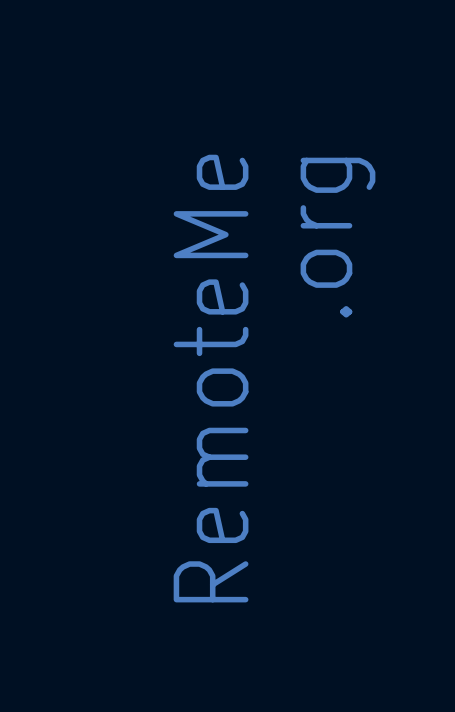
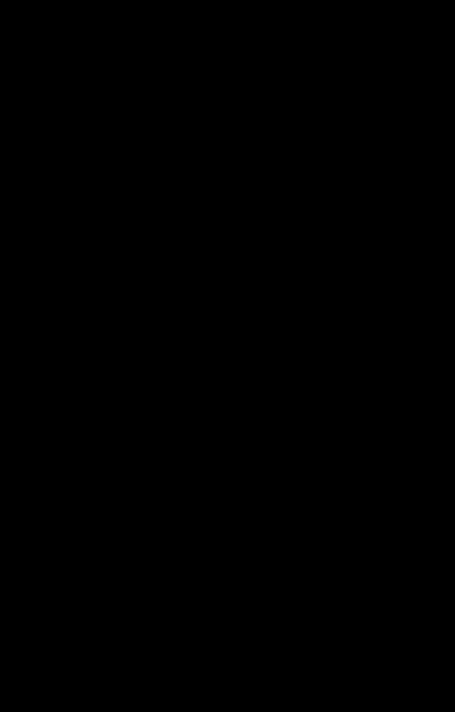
text: .org (337, 237) -> none
text: RemoteMe (211, 378) -> none

